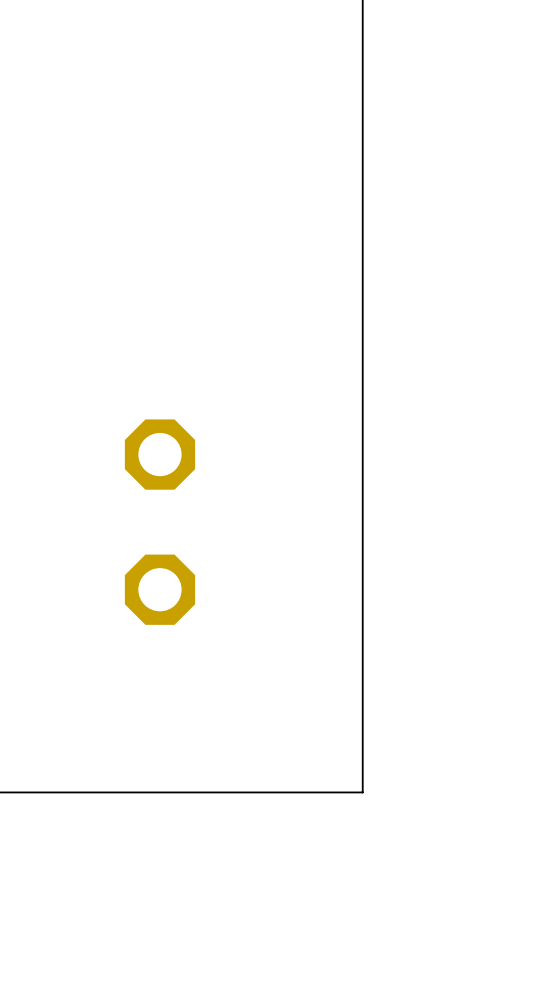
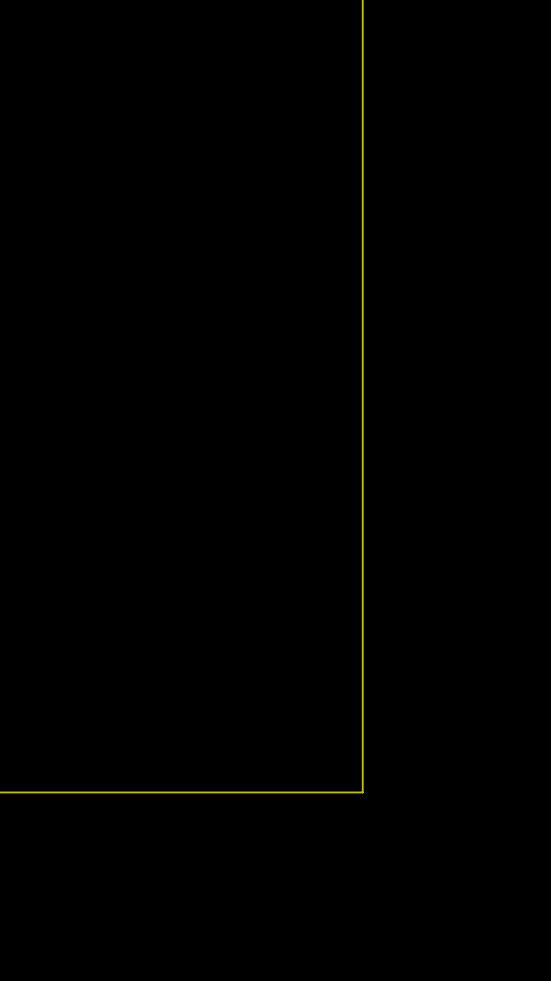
part: (159, 522) -> none

